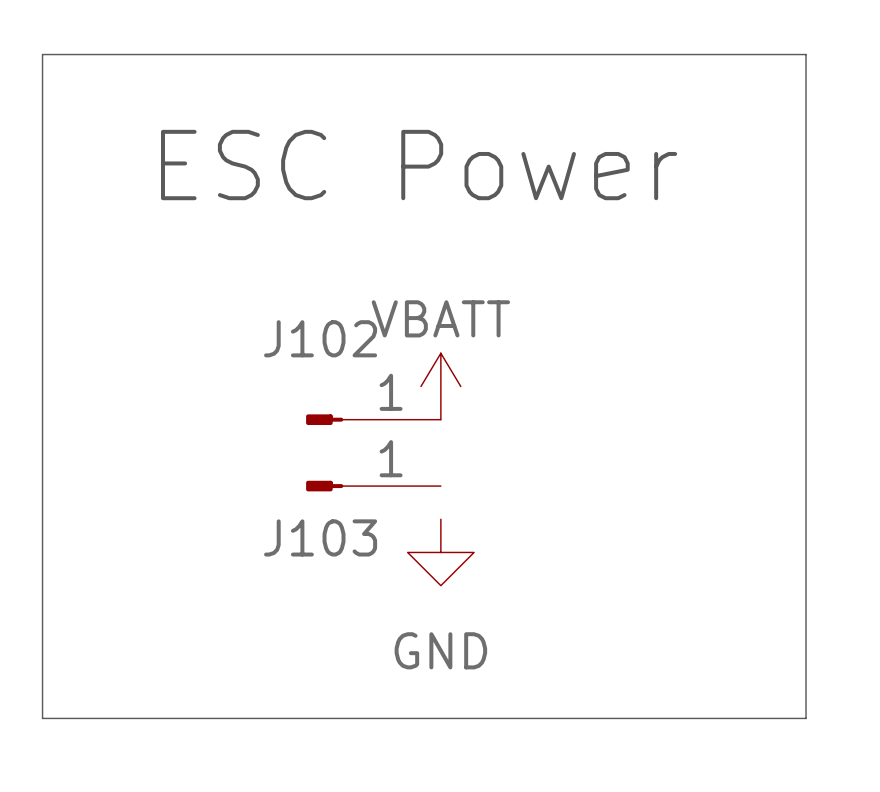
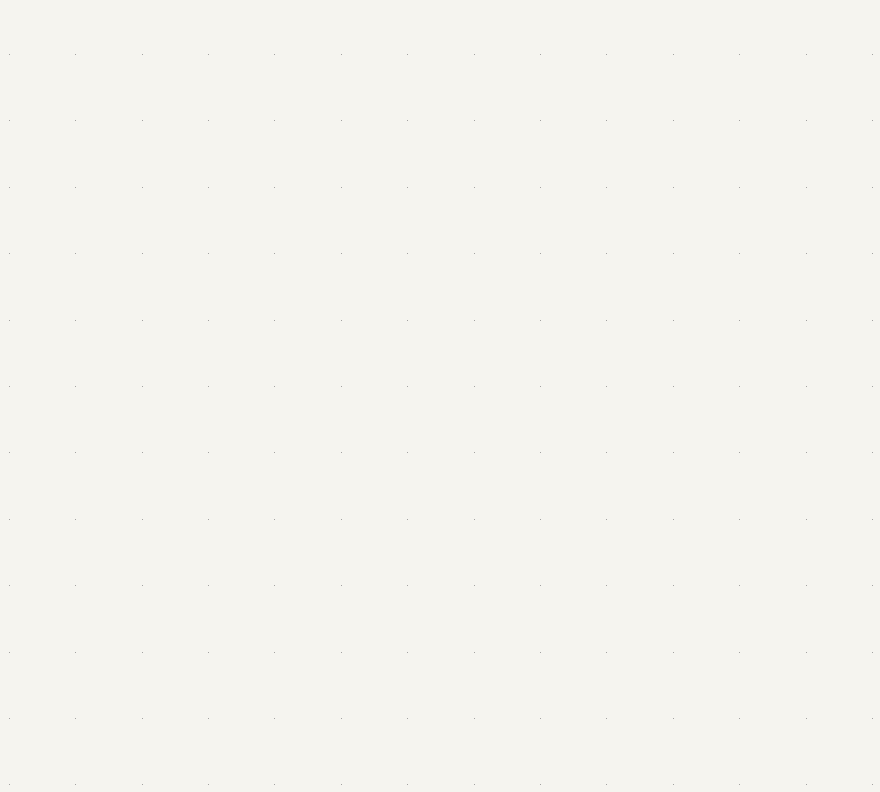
line: (42, 54) (806, 54) (806, 718) (42, 718) (42, 54) -> none
text: ESC Power (419, 165) -> none
power symbol: VBATT (440, 386) -> none
J102: (373, 419) -> none
J103: (373, 486) -> none
power symbol: GND (440, 552) -> none

